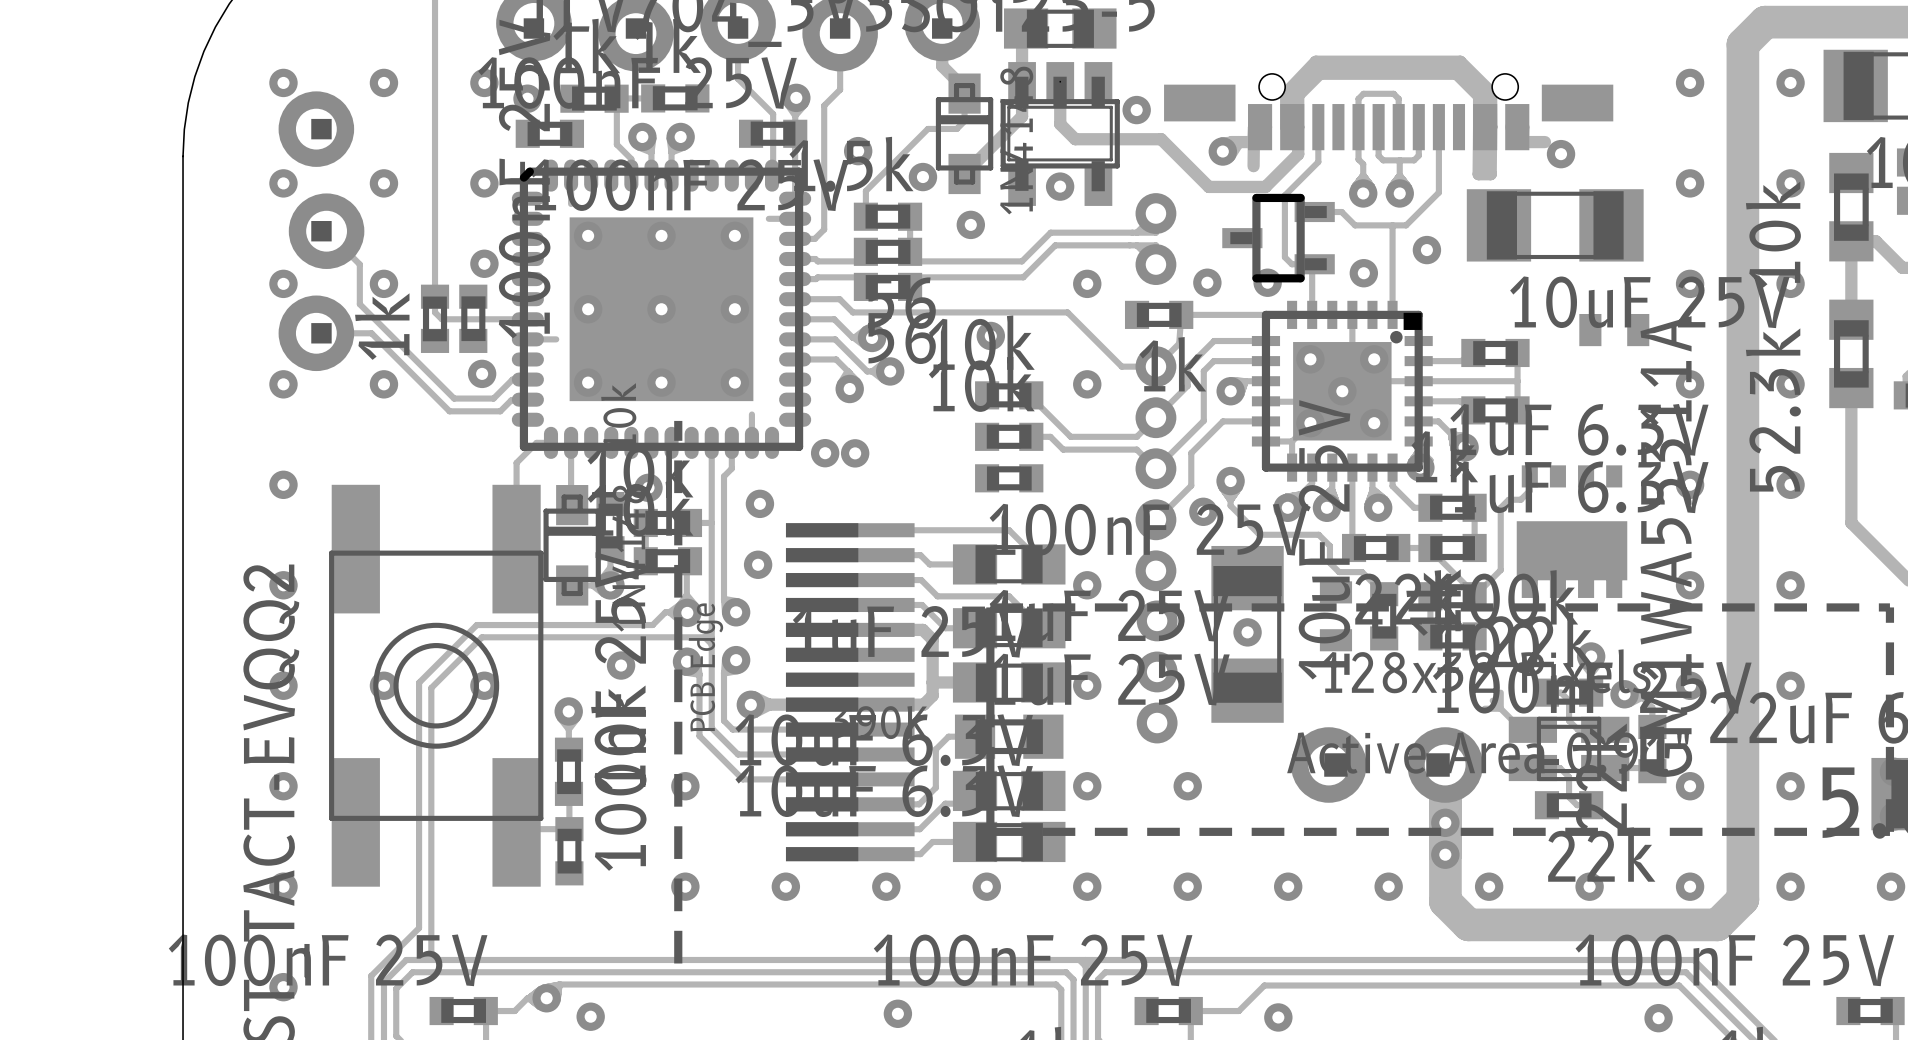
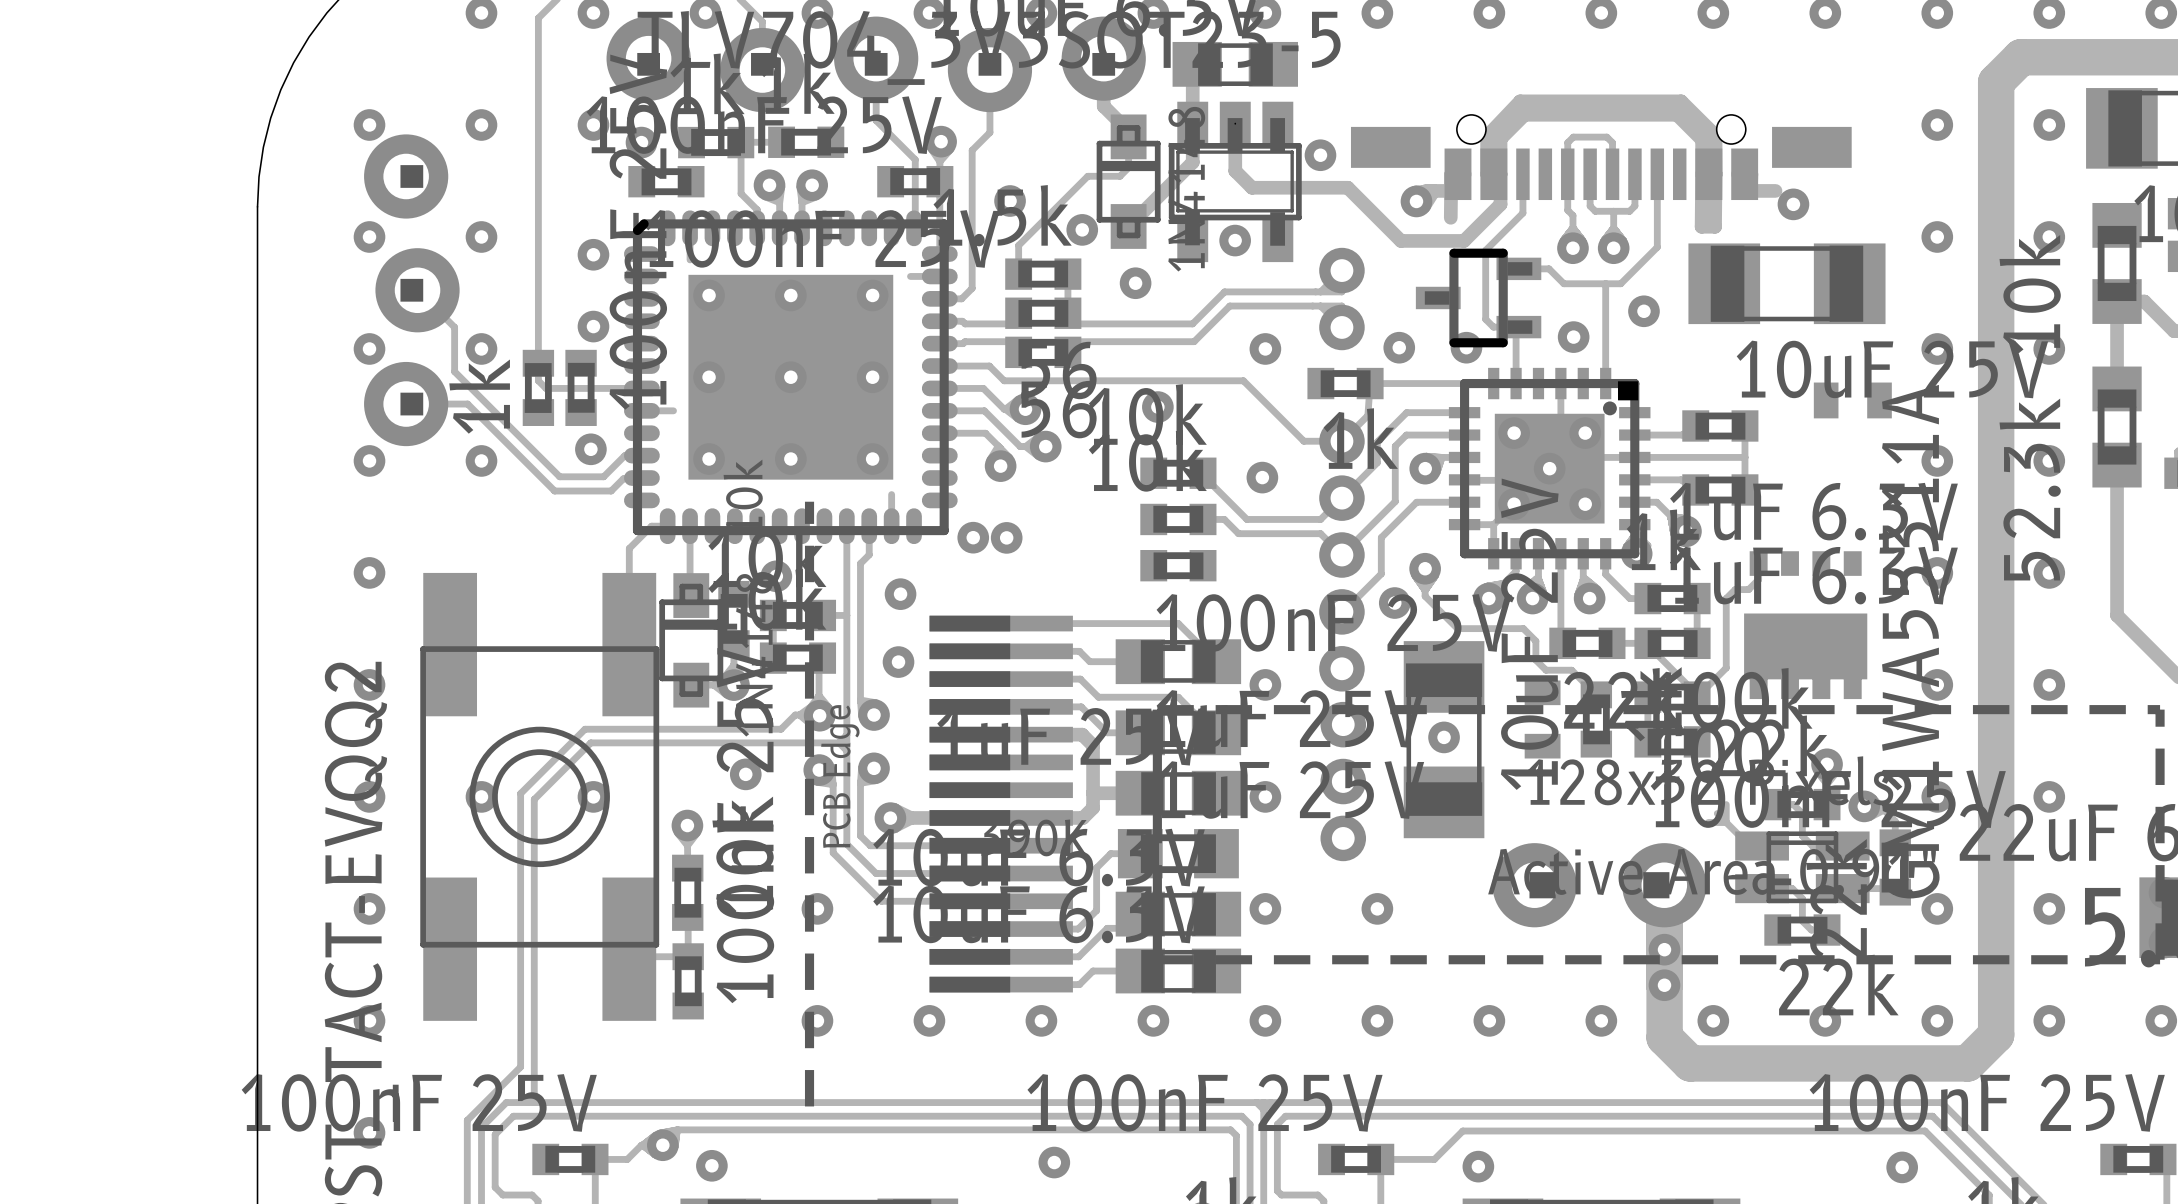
via position: (484, 183) -> (593, 254)
via position: (1087, 384) -> (1262, 477)

